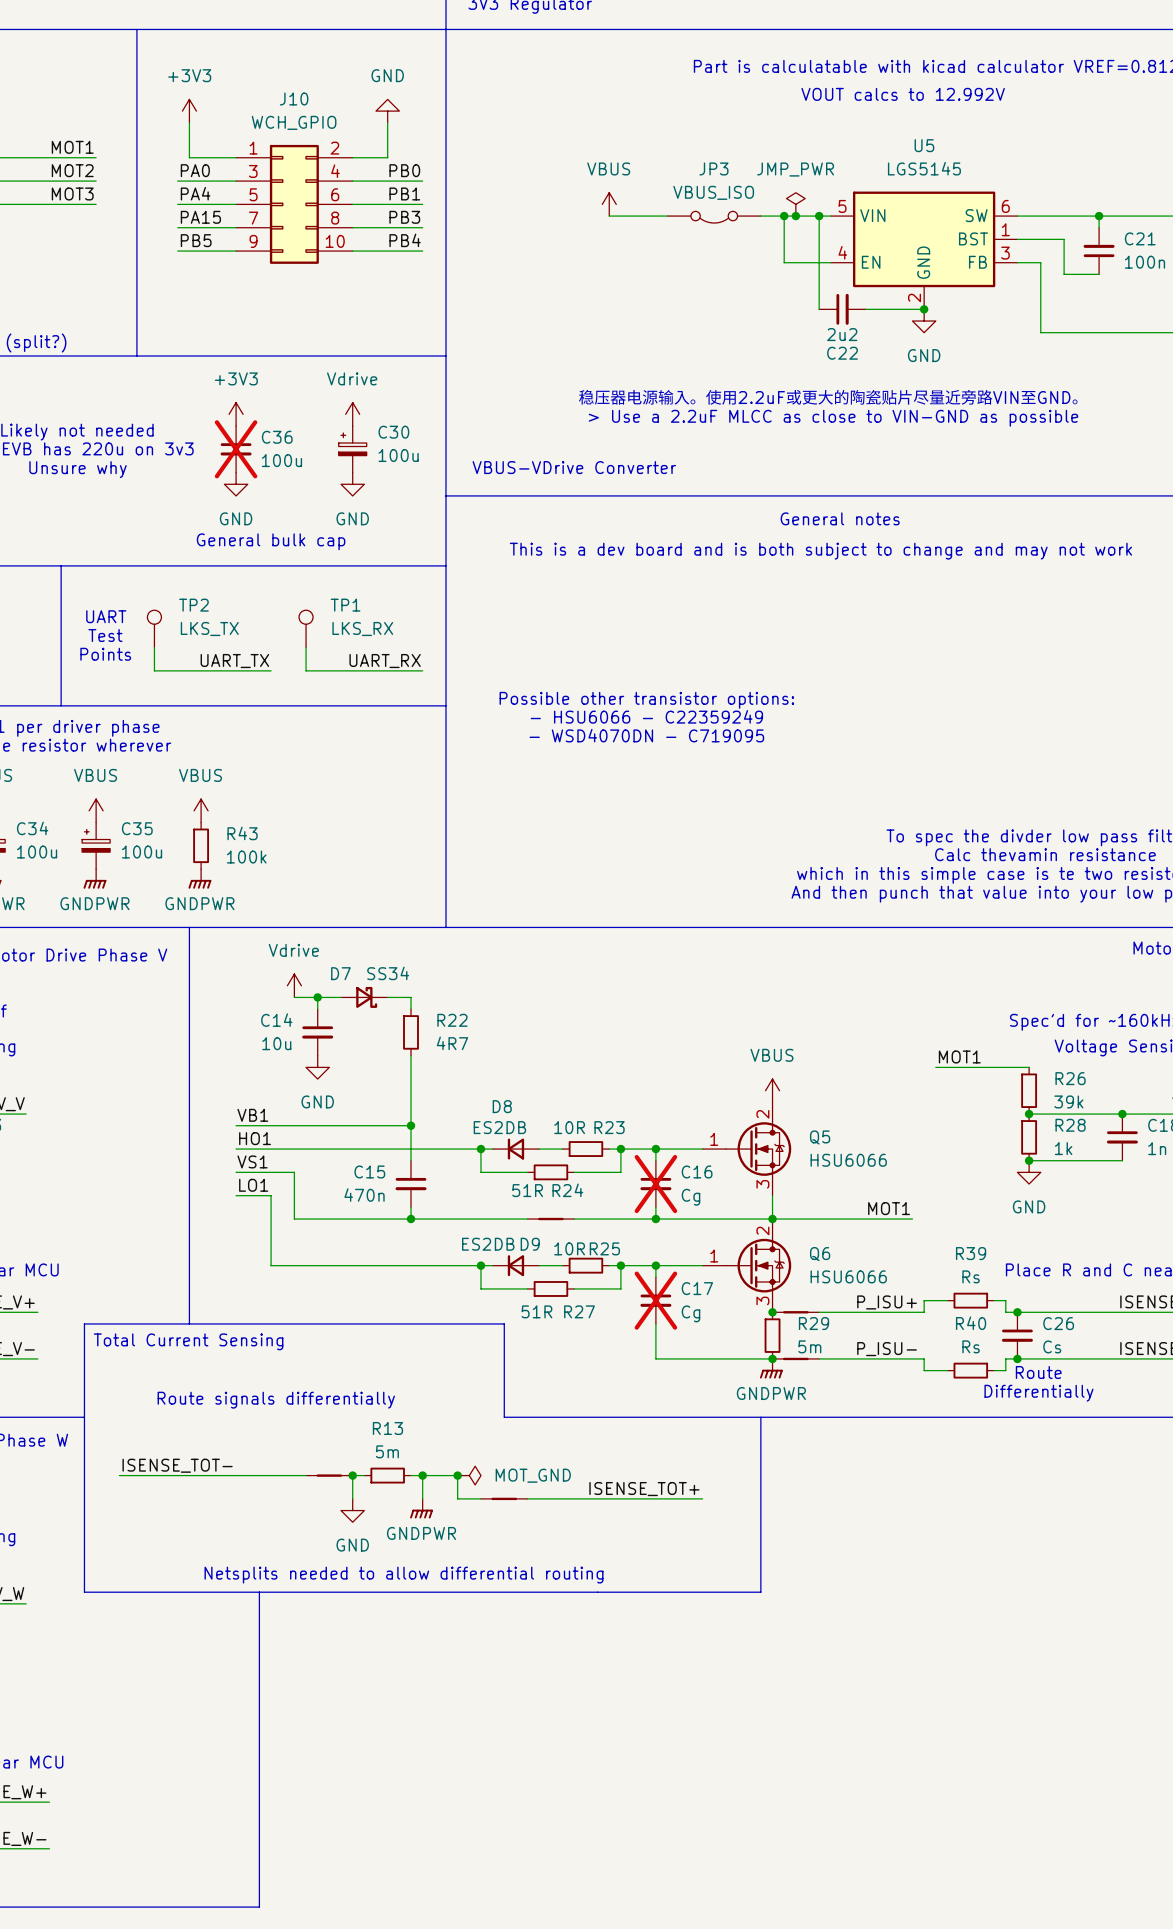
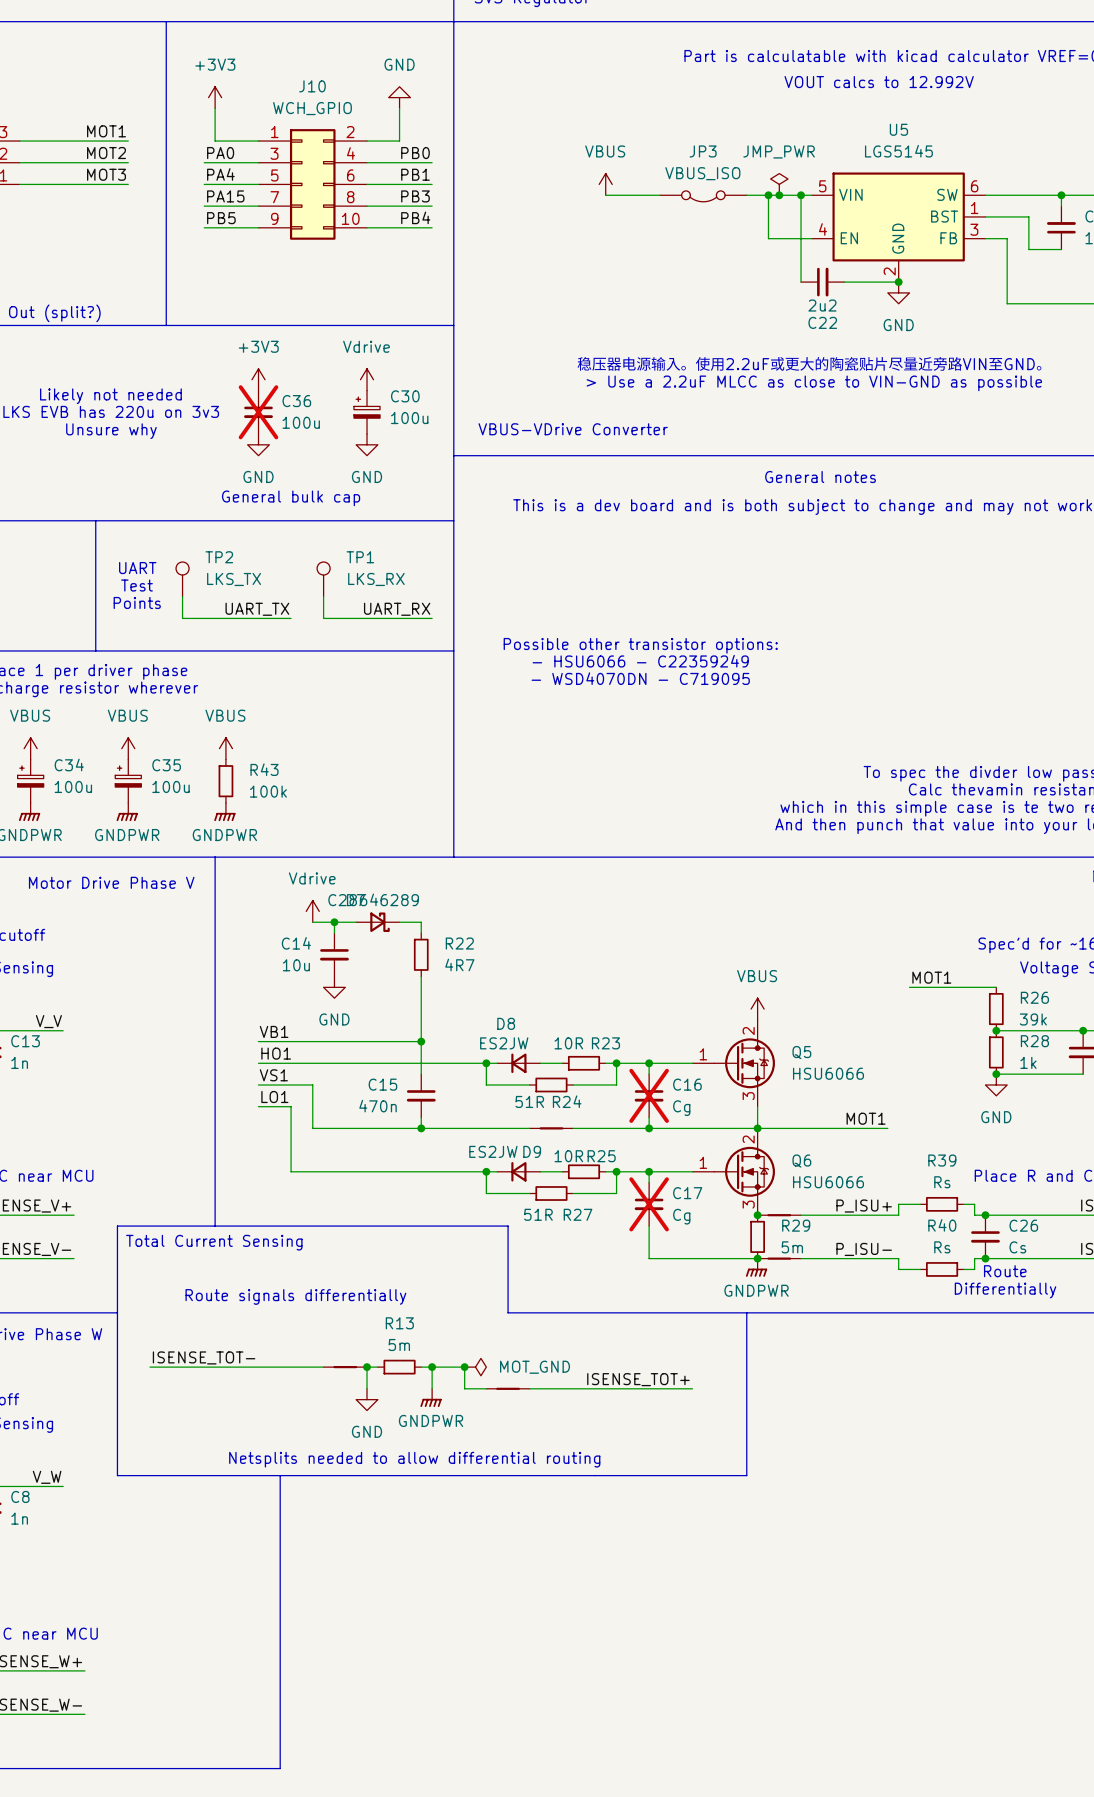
D7 value: SS34 (388, 973) -> C28646289 (373, 899)
D8 value: ES2DB (499, 1127) -> ES2JW (504, 1043)
D9 value: ES2DB (488, 1244) -> ES2JW (493, 1151)

